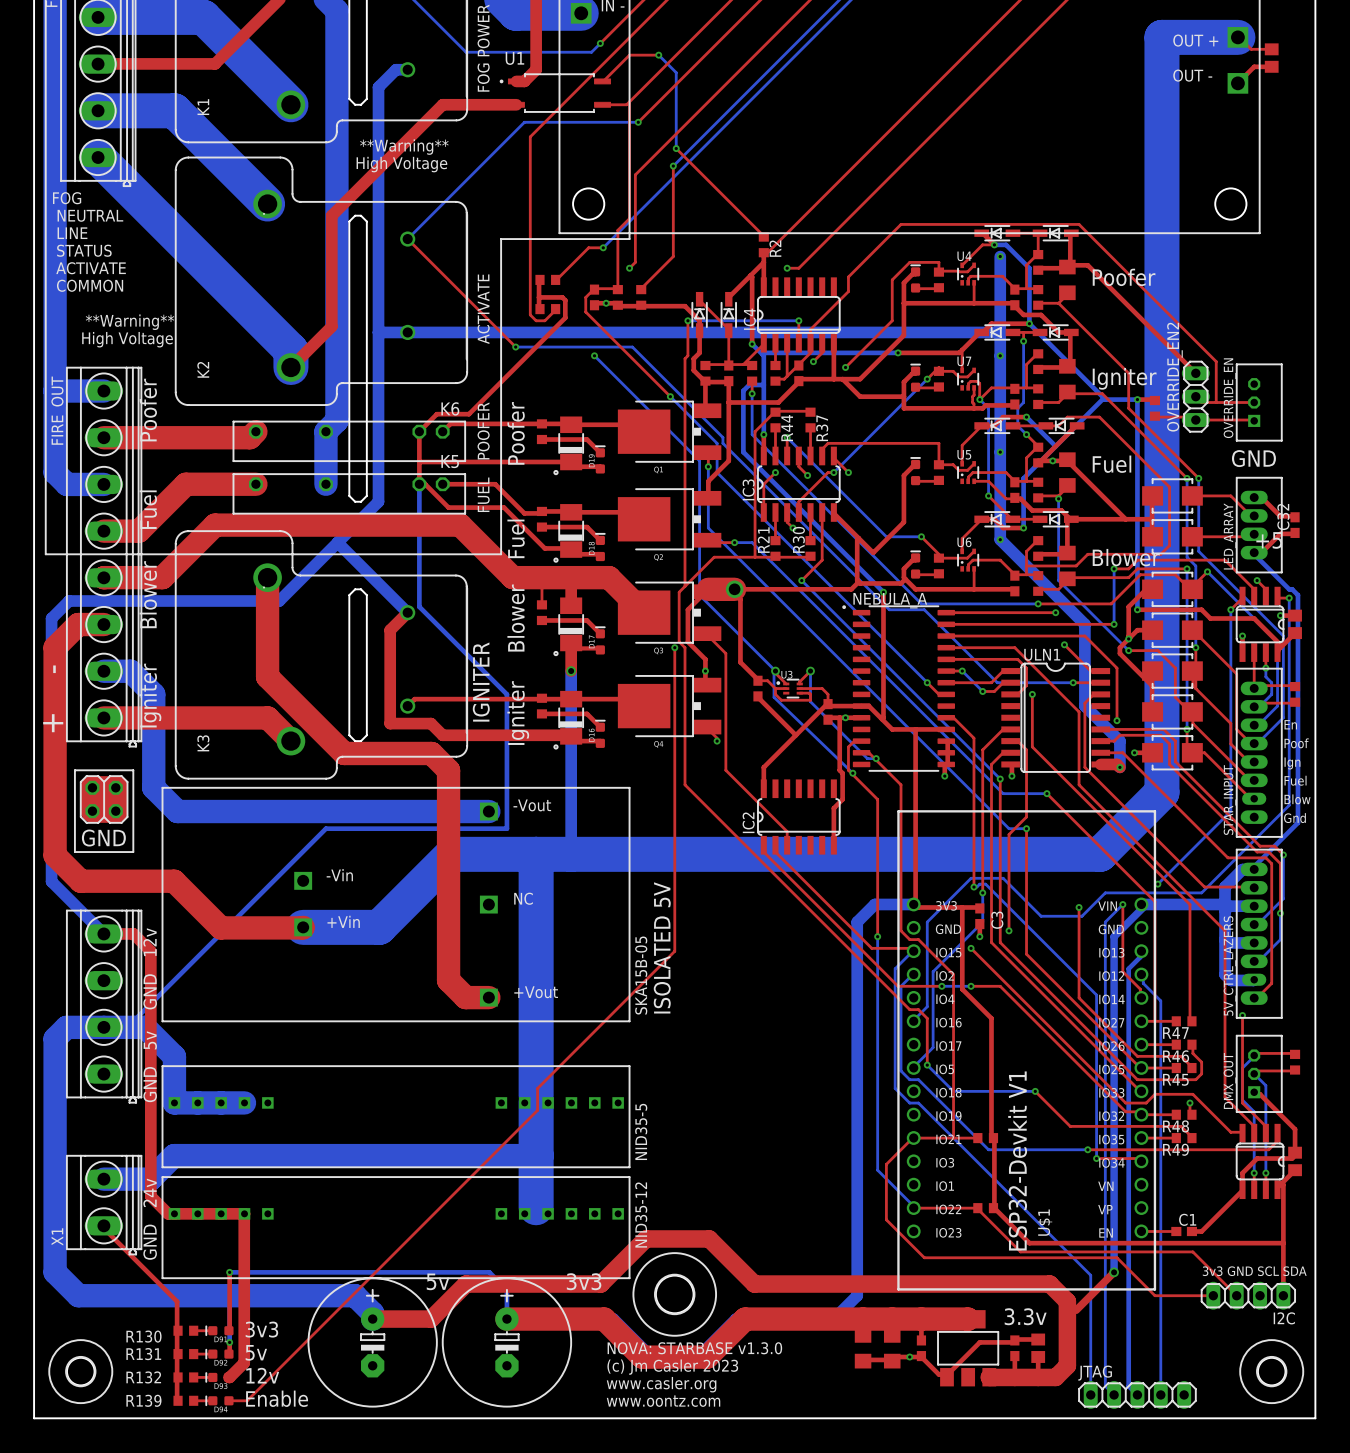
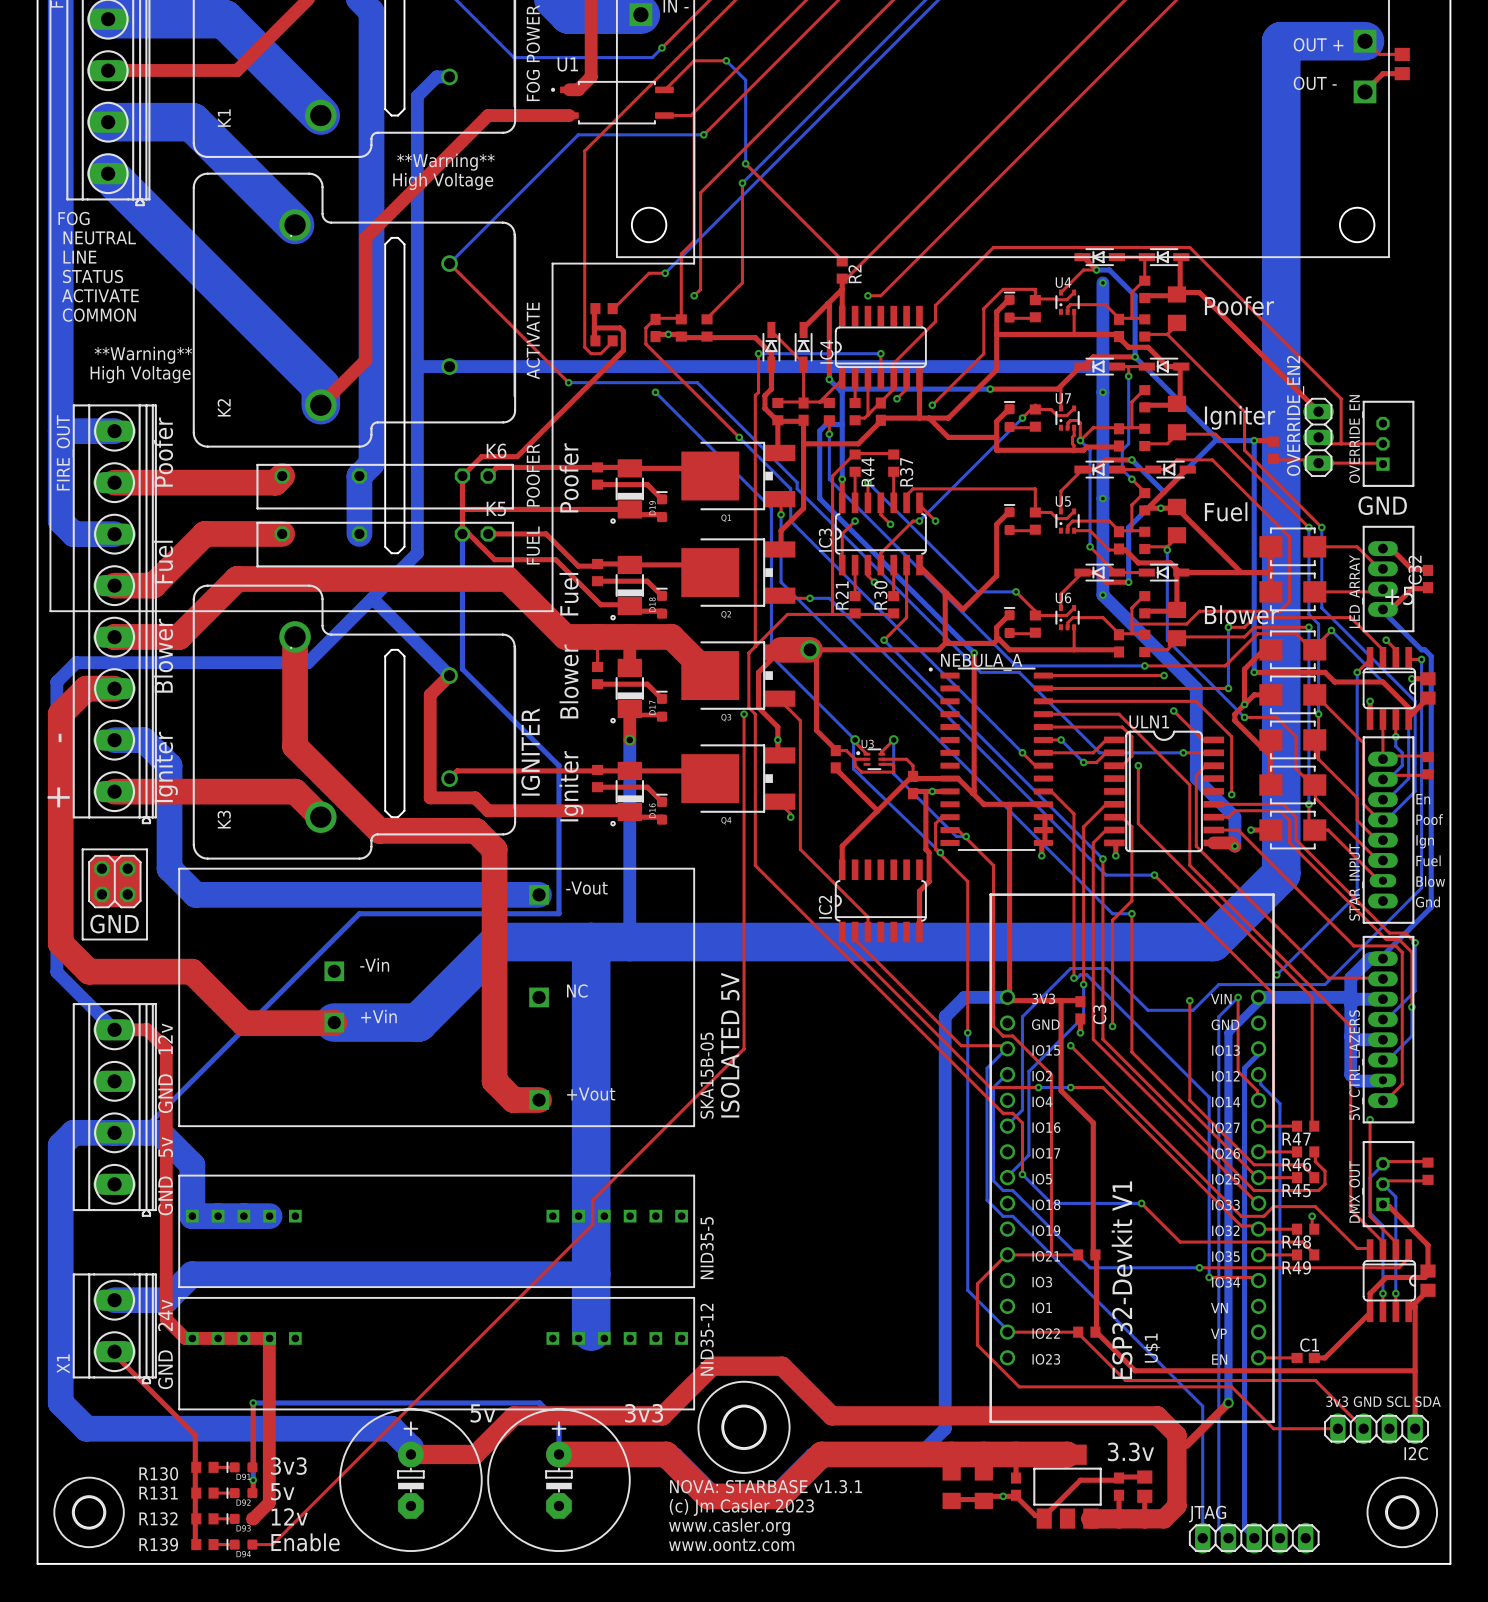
text: NOVA: STARBASE v1.3.0 (694, 1348) -> NOVA: STARBASE v1.3.1 (765, 1486)

